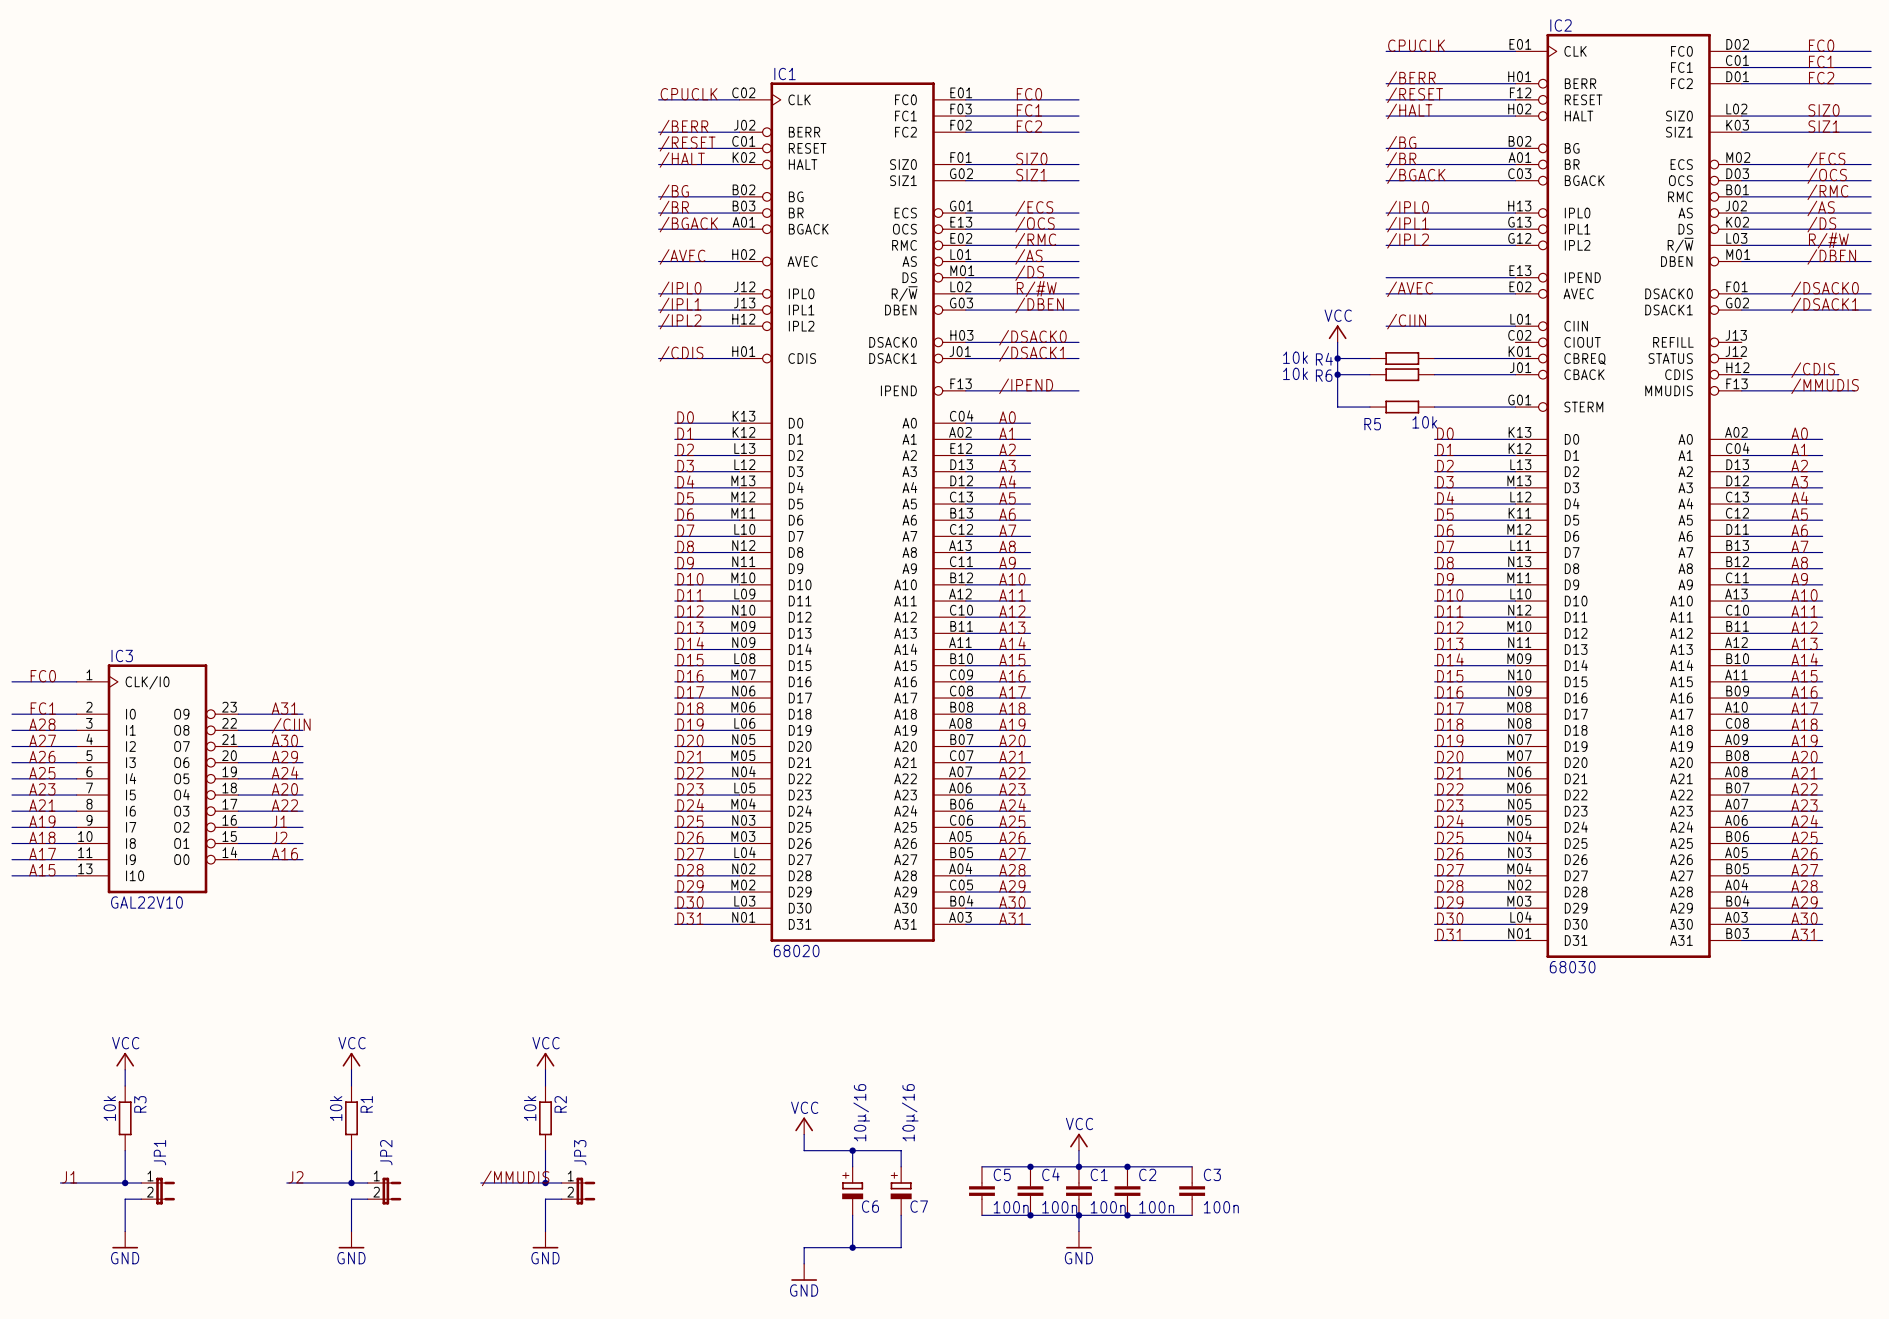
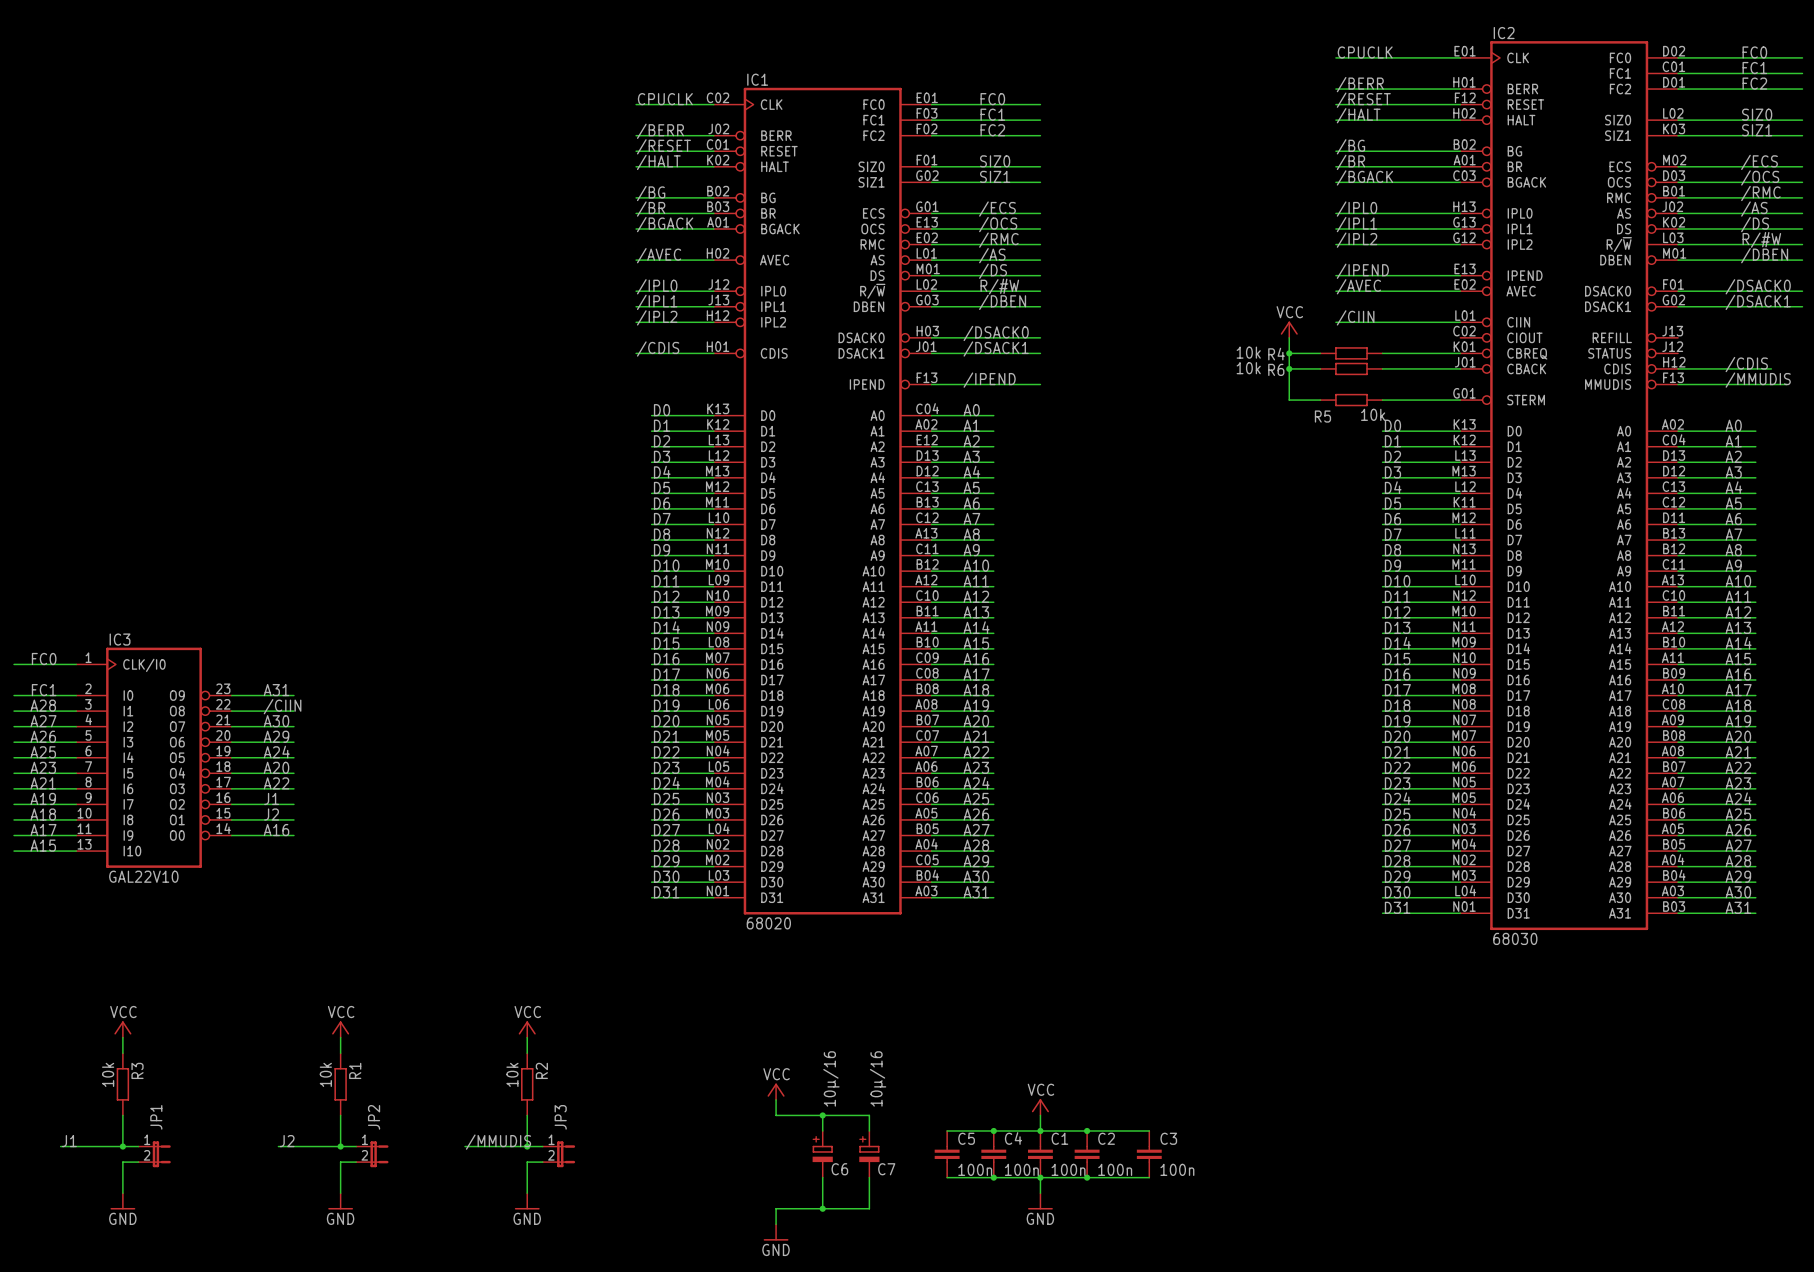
label: none -> /IPEND (1362, 271)

